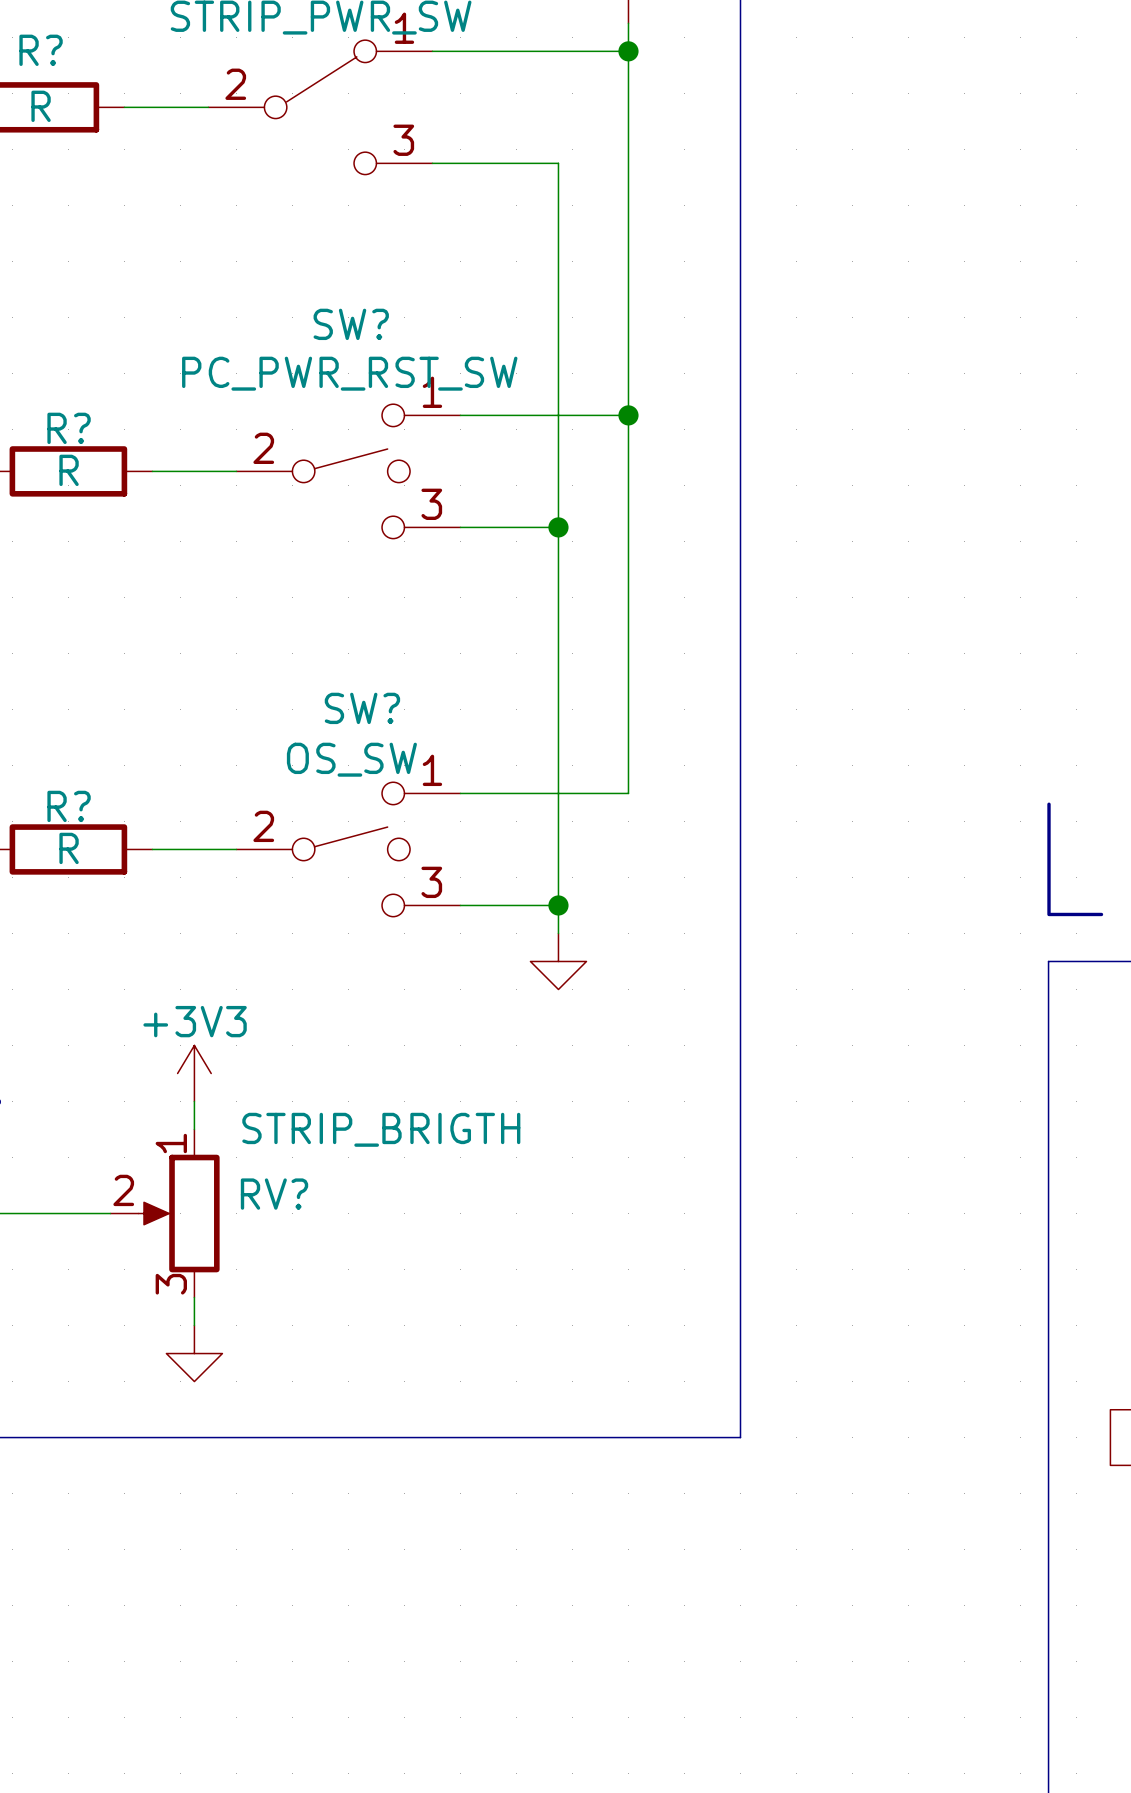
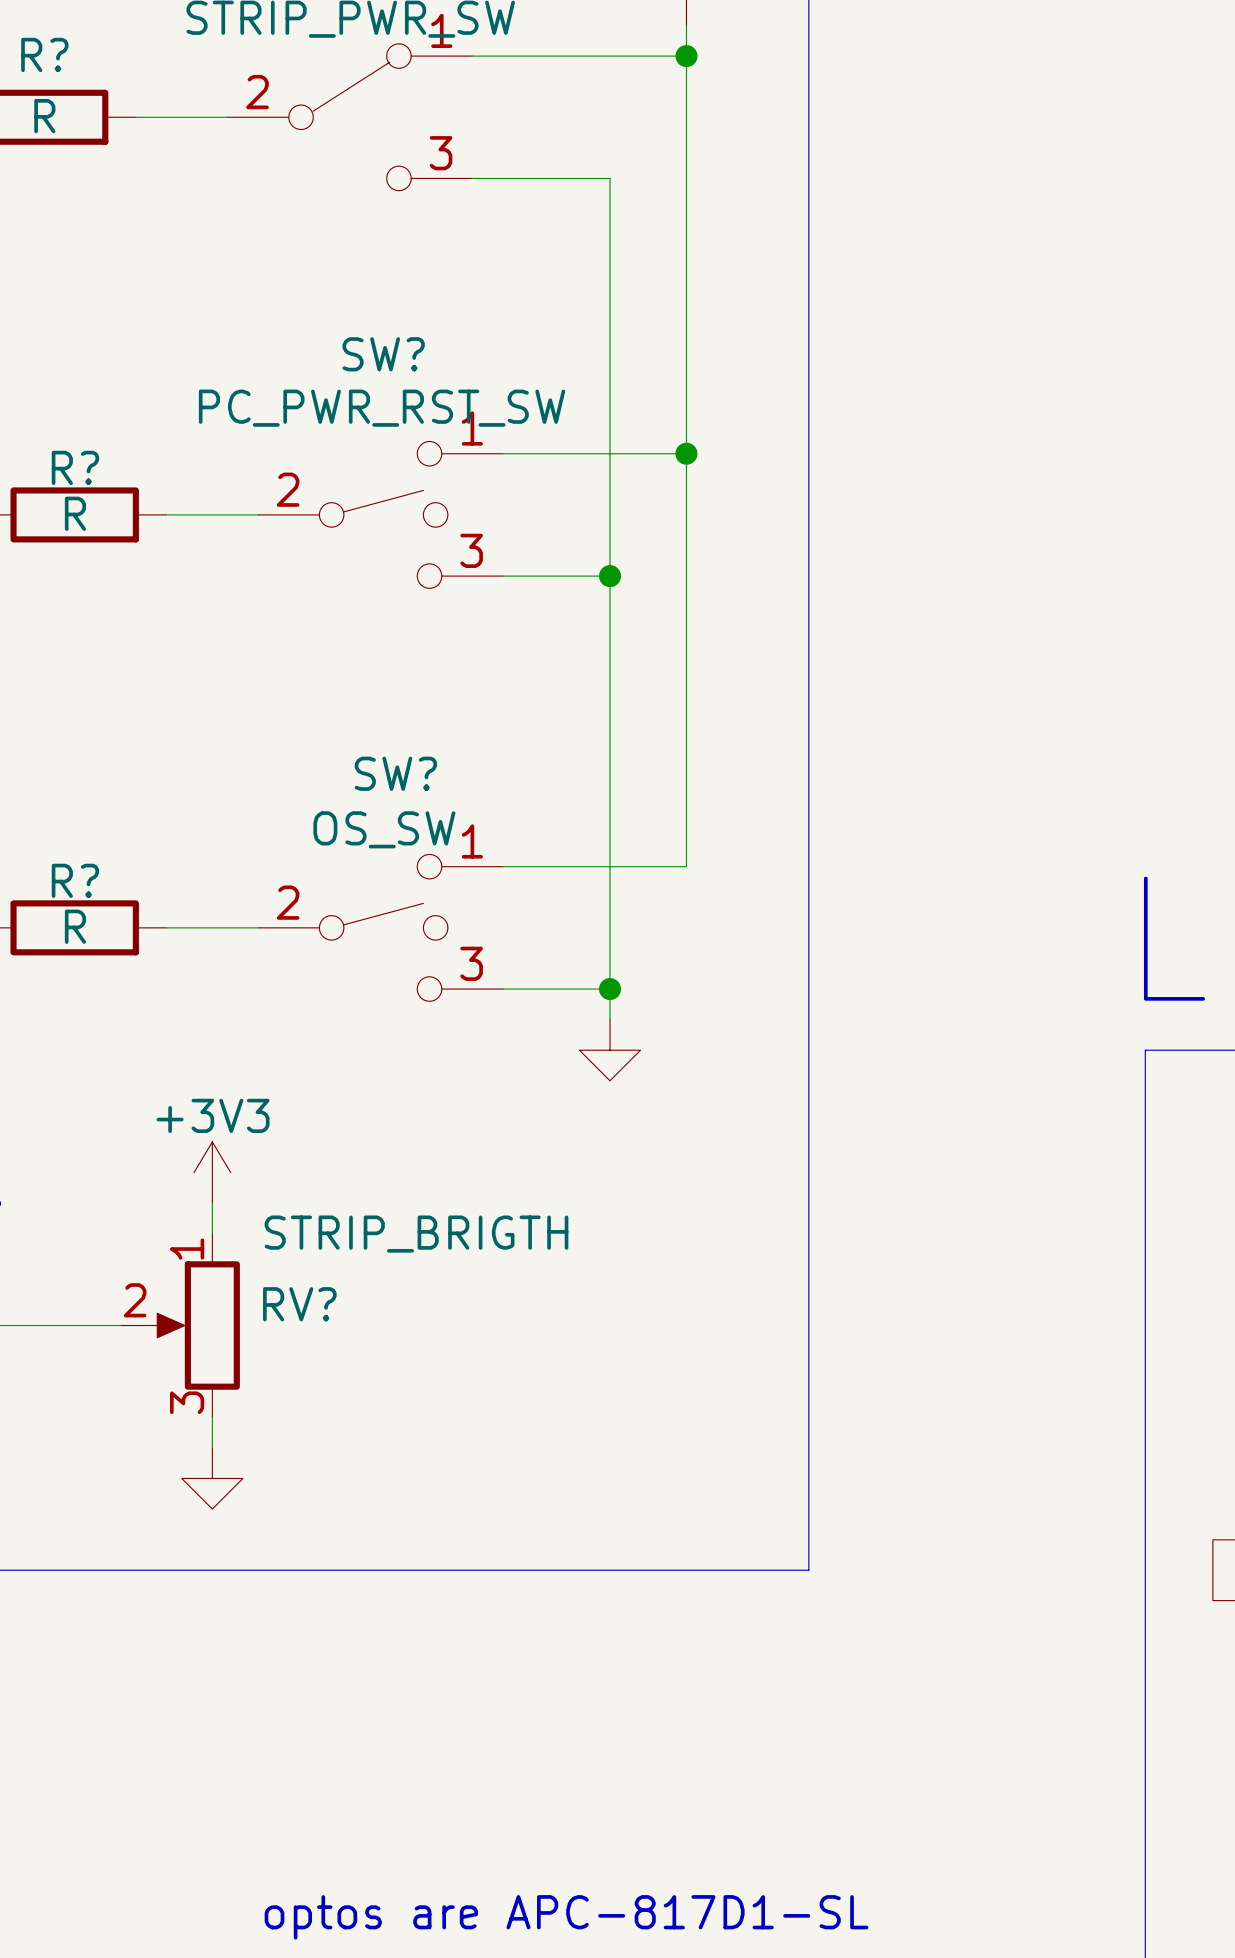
text: none -> optos are APC-817D1-SL (566, 1917)

